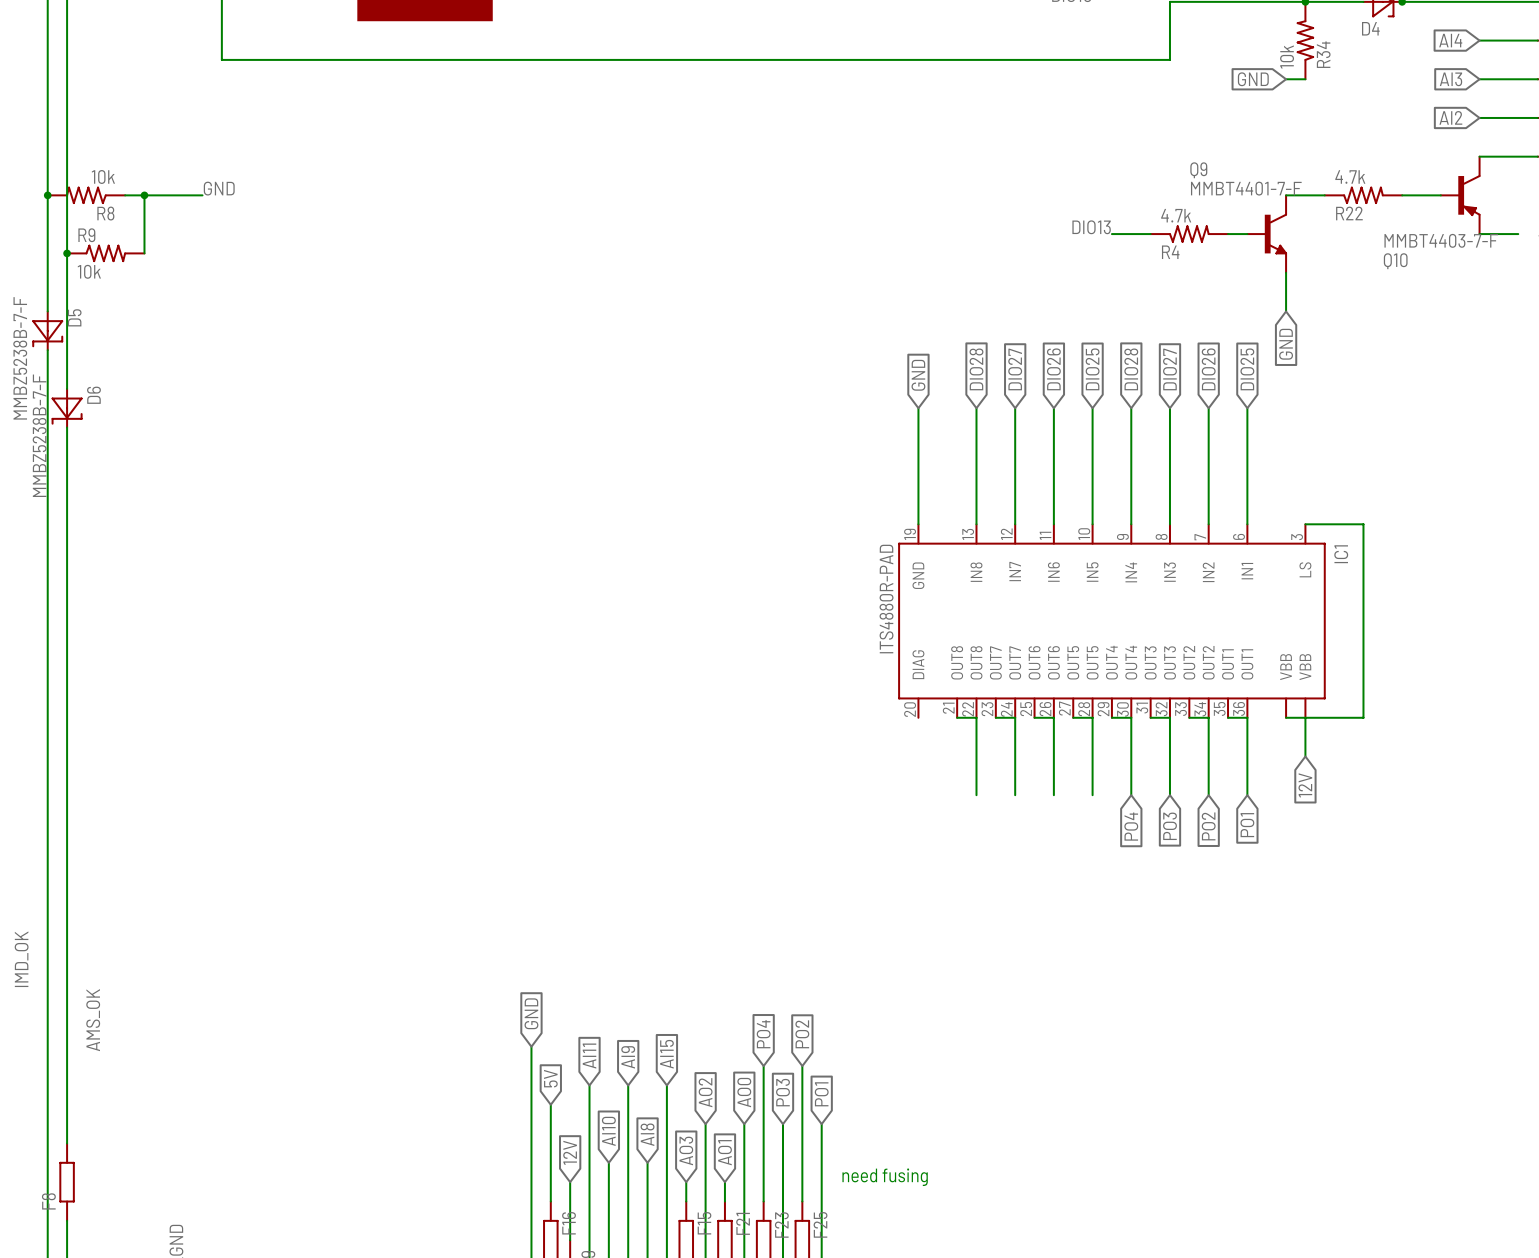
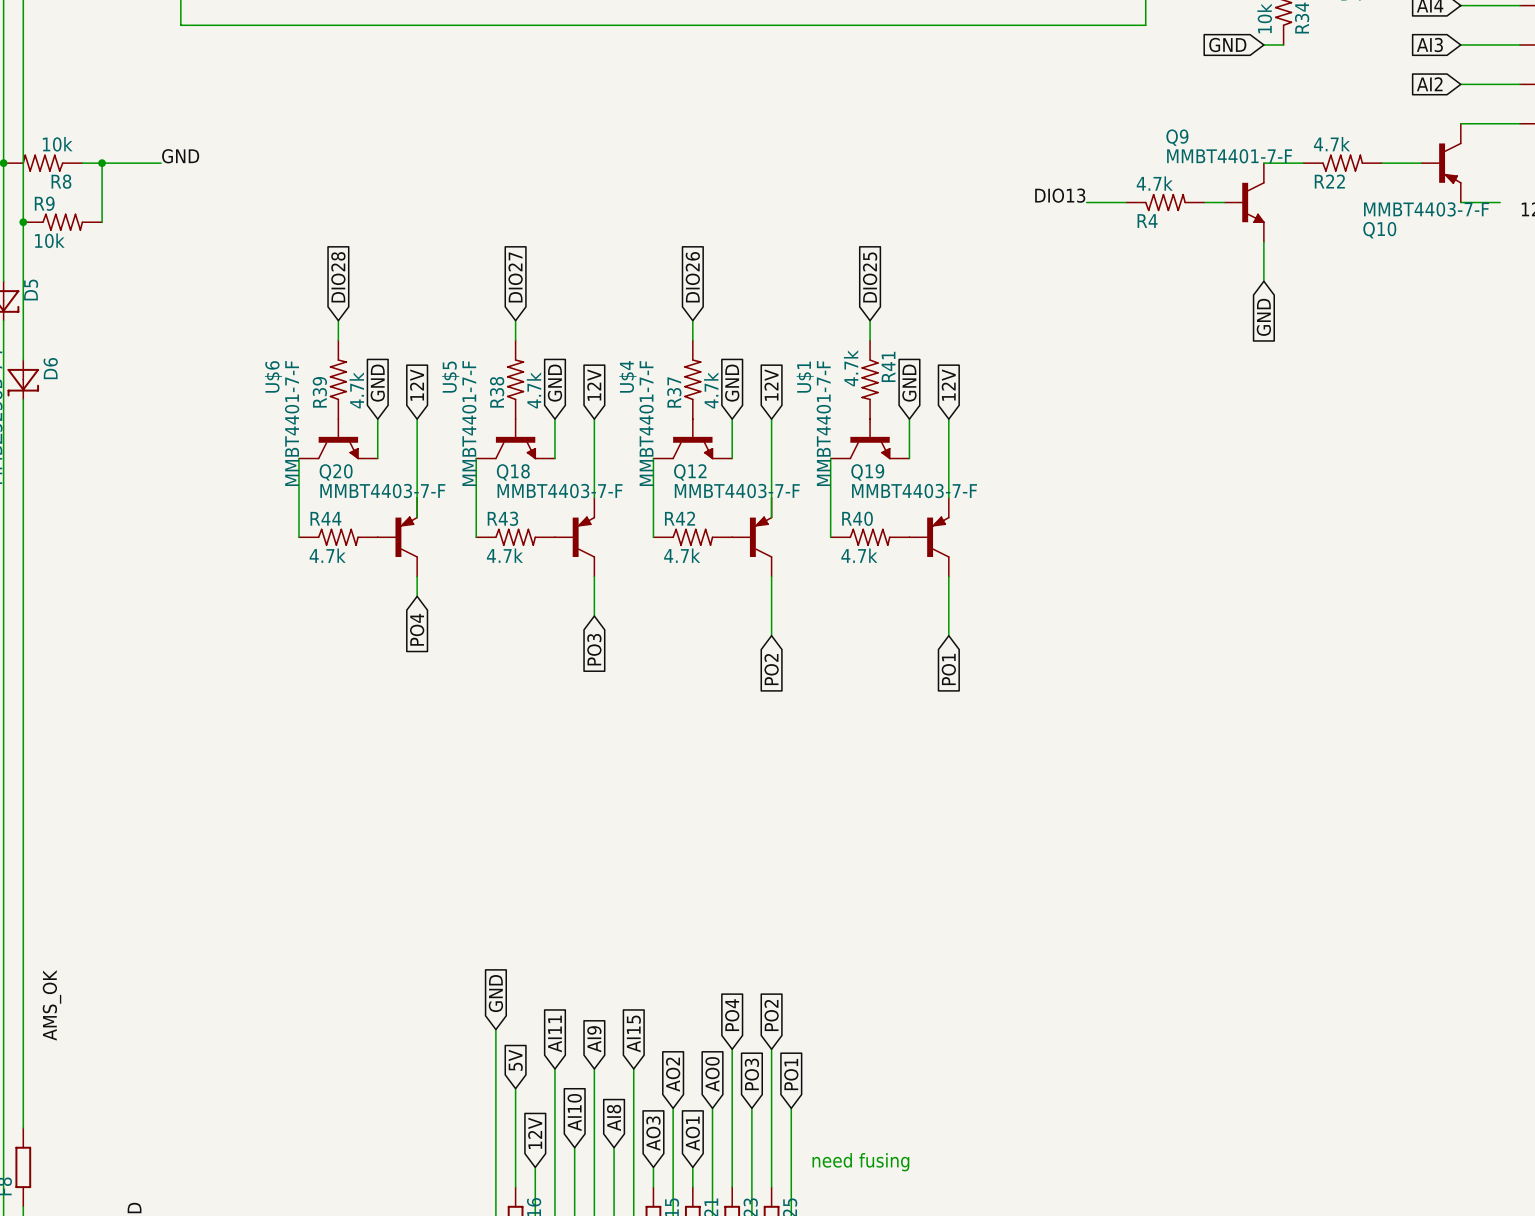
global label: none -> DIO28 (338, 277)
global label: none -> DIO27 (515, 277)
global label: none -> DIO26 (692, 277)
global label: none -> DIO25 (870, 277)
wire: none -> (338, 320) (338, 340)
wire: none -> (515, 320) (515, 340)
wire: none -> (692, 320) (692, 340)
wire: none -> (870, 320) (870, 340)
global label: DIO28 (976, 369) -> none
global label: DIO27 (1015, 369) -> none
global label: DIO26 (1053, 369) -> none
global label: DIO25 (1092, 369) -> none
global label: DIO28 (1131, 369) -> none
global label: DIO27 (1169, 369) -> none
global label: DIO26 (1208, 369) -> none
global label: DIO25 (1247, 369) -> none
global label position: GND (918, 375) -> GND (909, 383)
R39: none -> 4.7k (338, 379)
R38: none -> 4.7k (515, 379)
R37: none -> 4.7k (692, 379)
R41: none -> 4.7k (870, 379)
wire: (918, 408) (918, 524) -> none
wire: (976, 408) (976, 446) -> (909, 419) (909, 458)
wire: (1015, 408) (1015, 524) -> none
wire: (1053, 408) (1053, 524) -> none
wire: (1092, 408) (1092, 524) -> none
wire: (1131, 408) (1131, 524) -> none
wire: (1169, 408) (1169, 524) -> none
wire: (1208, 408) (1208, 524) -> none
wire: (1247, 408) (1247, 524) -> none
global label: none -> GND (377, 383)
global label: none -> GND (554, 383)
global label: none -> GND (732, 383)
global label: none -> 12V (417, 385)
global label: none -> 12V (594, 385)
global label: none -> 12V (771, 385)
global label: none -> 12V (948, 385)
wire: none -> (377, 419) (377, 458)
wire: none -> (417, 419) (417, 517)
wire: none -> (554, 419) (554, 458)
wire: none -> (594, 419) (594, 497)
wire: none -> (732, 419) (732, 458)
wire: none -> (771, 419) (771, 517)
U$6: none -> MMBT4401-7-F (338, 439)
U$5: none -> MMBT4401-7-F (515, 439)
U$4: none -> MMBT4401-7-F (692, 439)
U$1: none -> MMBT4401-7-F (870, 439)
wire: none -> (298, 458) (298, 537)
wire: none -> (476, 458) (476, 537)
wire: none -> (653, 458) (653, 537)
wire: none -> (830, 458) (830, 537)
wire: (1305, 524) (1363, 524) (1363, 717) (1286, 717) -> none
R44: none -> 4.7k (338, 537)
Q20: none -> MMBT4403-7-F (397, 537)
R43: none -> 4.7k (515, 537)
Q18: none -> MMBT4403-7-F (574, 537)
R42: none -> 4.7k (692, 537)
Q12: none -> MMBT4403-7-F (752, 537)
R40: none -> 4.7k (870, 537)
Q19: none -> MMBT4403-7-F (929, 537)
wire: none -> (417, 576) (417, 596)
wire: none -> (594, 576) (594, 616)
wire: none -> (771, 576) (771, 635)
wire: none -> (948, 576) (948, 635)
IC1: ITS4880R-PAD (1111, 621) -> none
global label: none -> PO4 (417, 629)
global label: none -> PO3 (594, 649)
global label: none -> PO1 (948, 669)
global label: none -> PO2 (771, 669)
wire: (957, 717) (976, 717) (976, 795) -> none
wire: (995, 717) (1015, 717) (1015, 795) -> none
wire: (1034, 717) (1053, 717) (1053, 795) -> none
wire: (1073, 717) (1092, 717) (1092, 795) -> none
wire: (1111, 717) (1131, 717) (1131, 795) -> none
wire: (1150, 717) (1169, 717) (1169, 795) -> none
wire: (1189, 717) (1208, 717) (1208, 795) -> none
wire: (1228, 717) (1247, 717) (1247, 795) -> none
wire: (1305, 717) (1305, 756) -> none
global label: 12V (1305, 785) -> none
global label: PO1 (1247, 825) -> none
global label: PO4 (1131, 826) -> none
global label: PO3 (1169, 826) -> none
global label: PO2 (1208, 826) -> none

